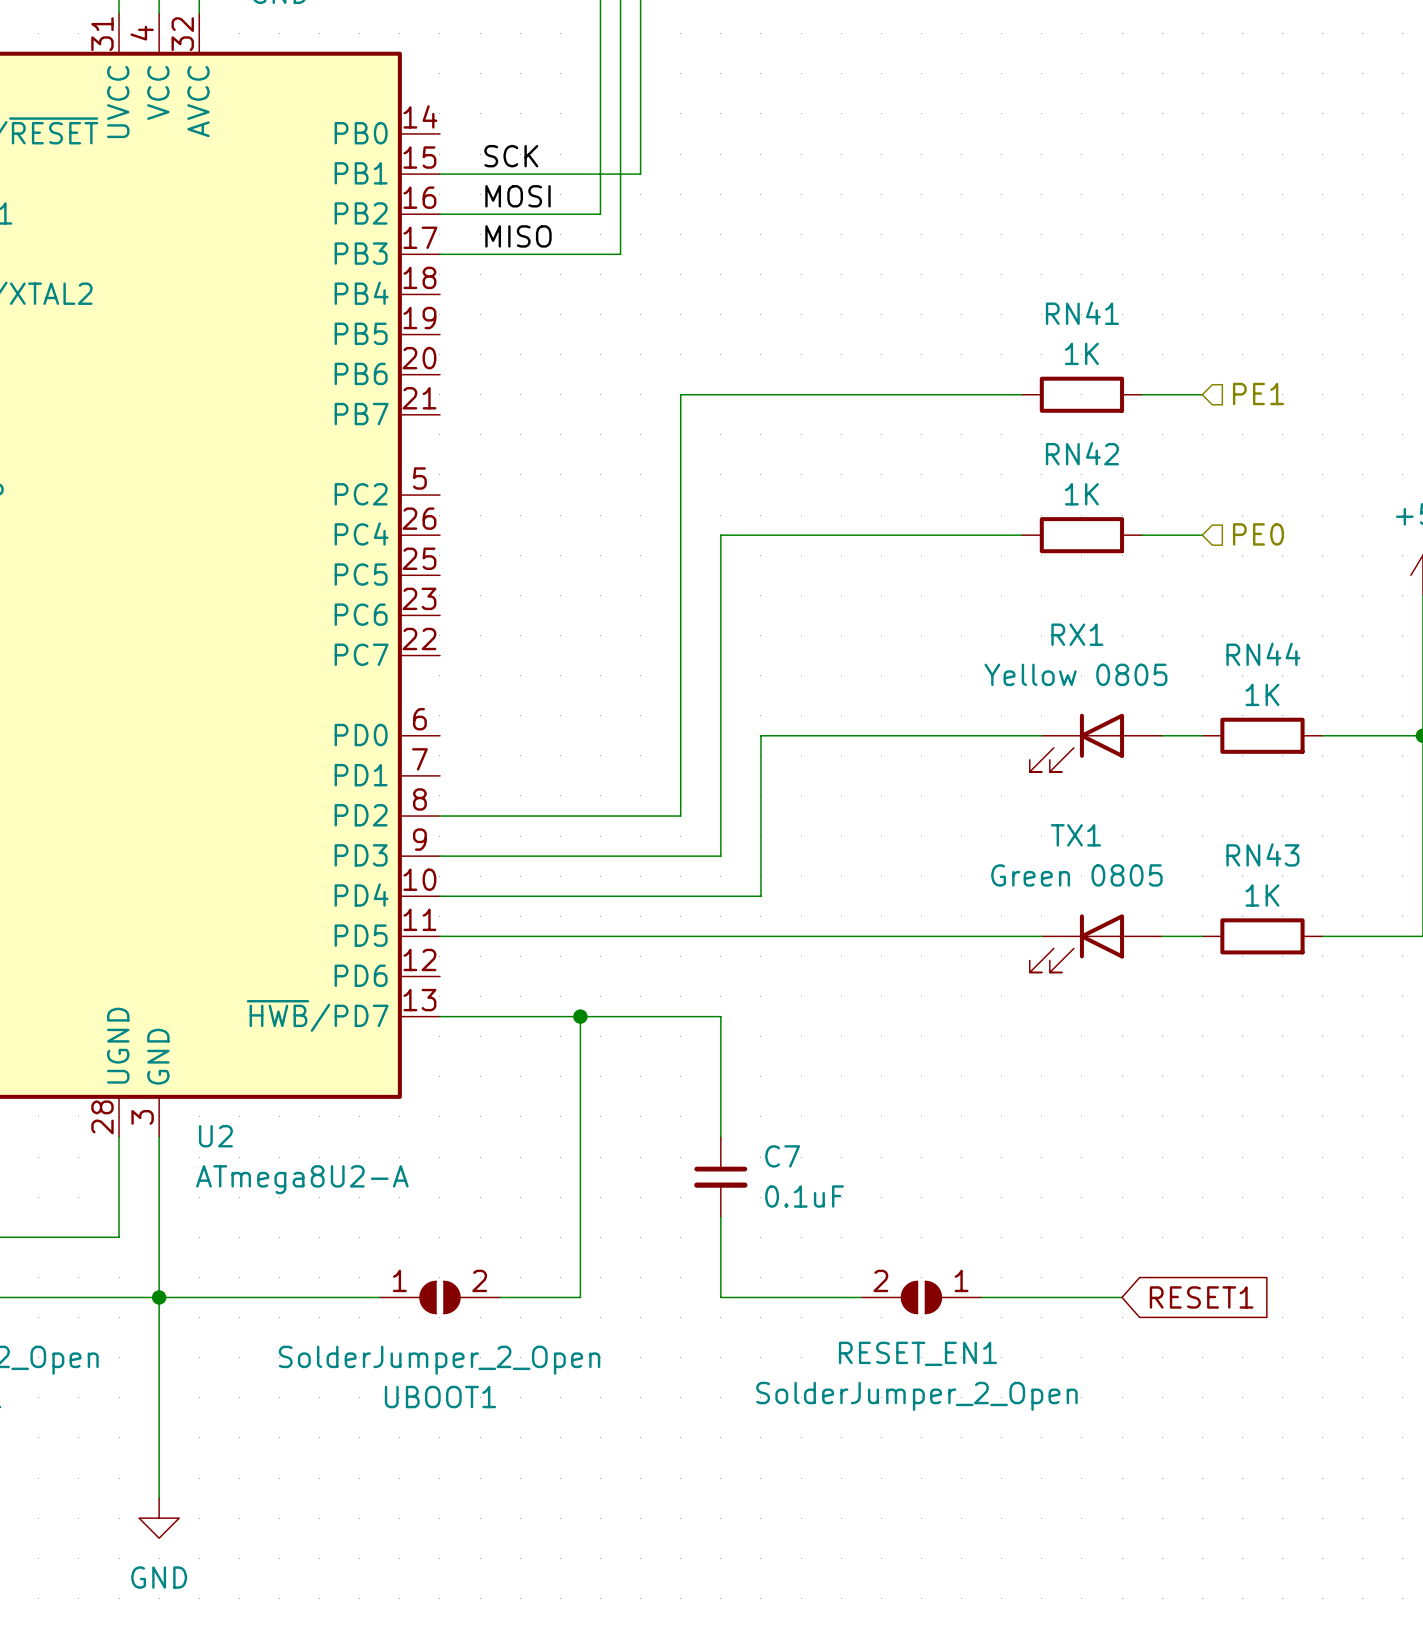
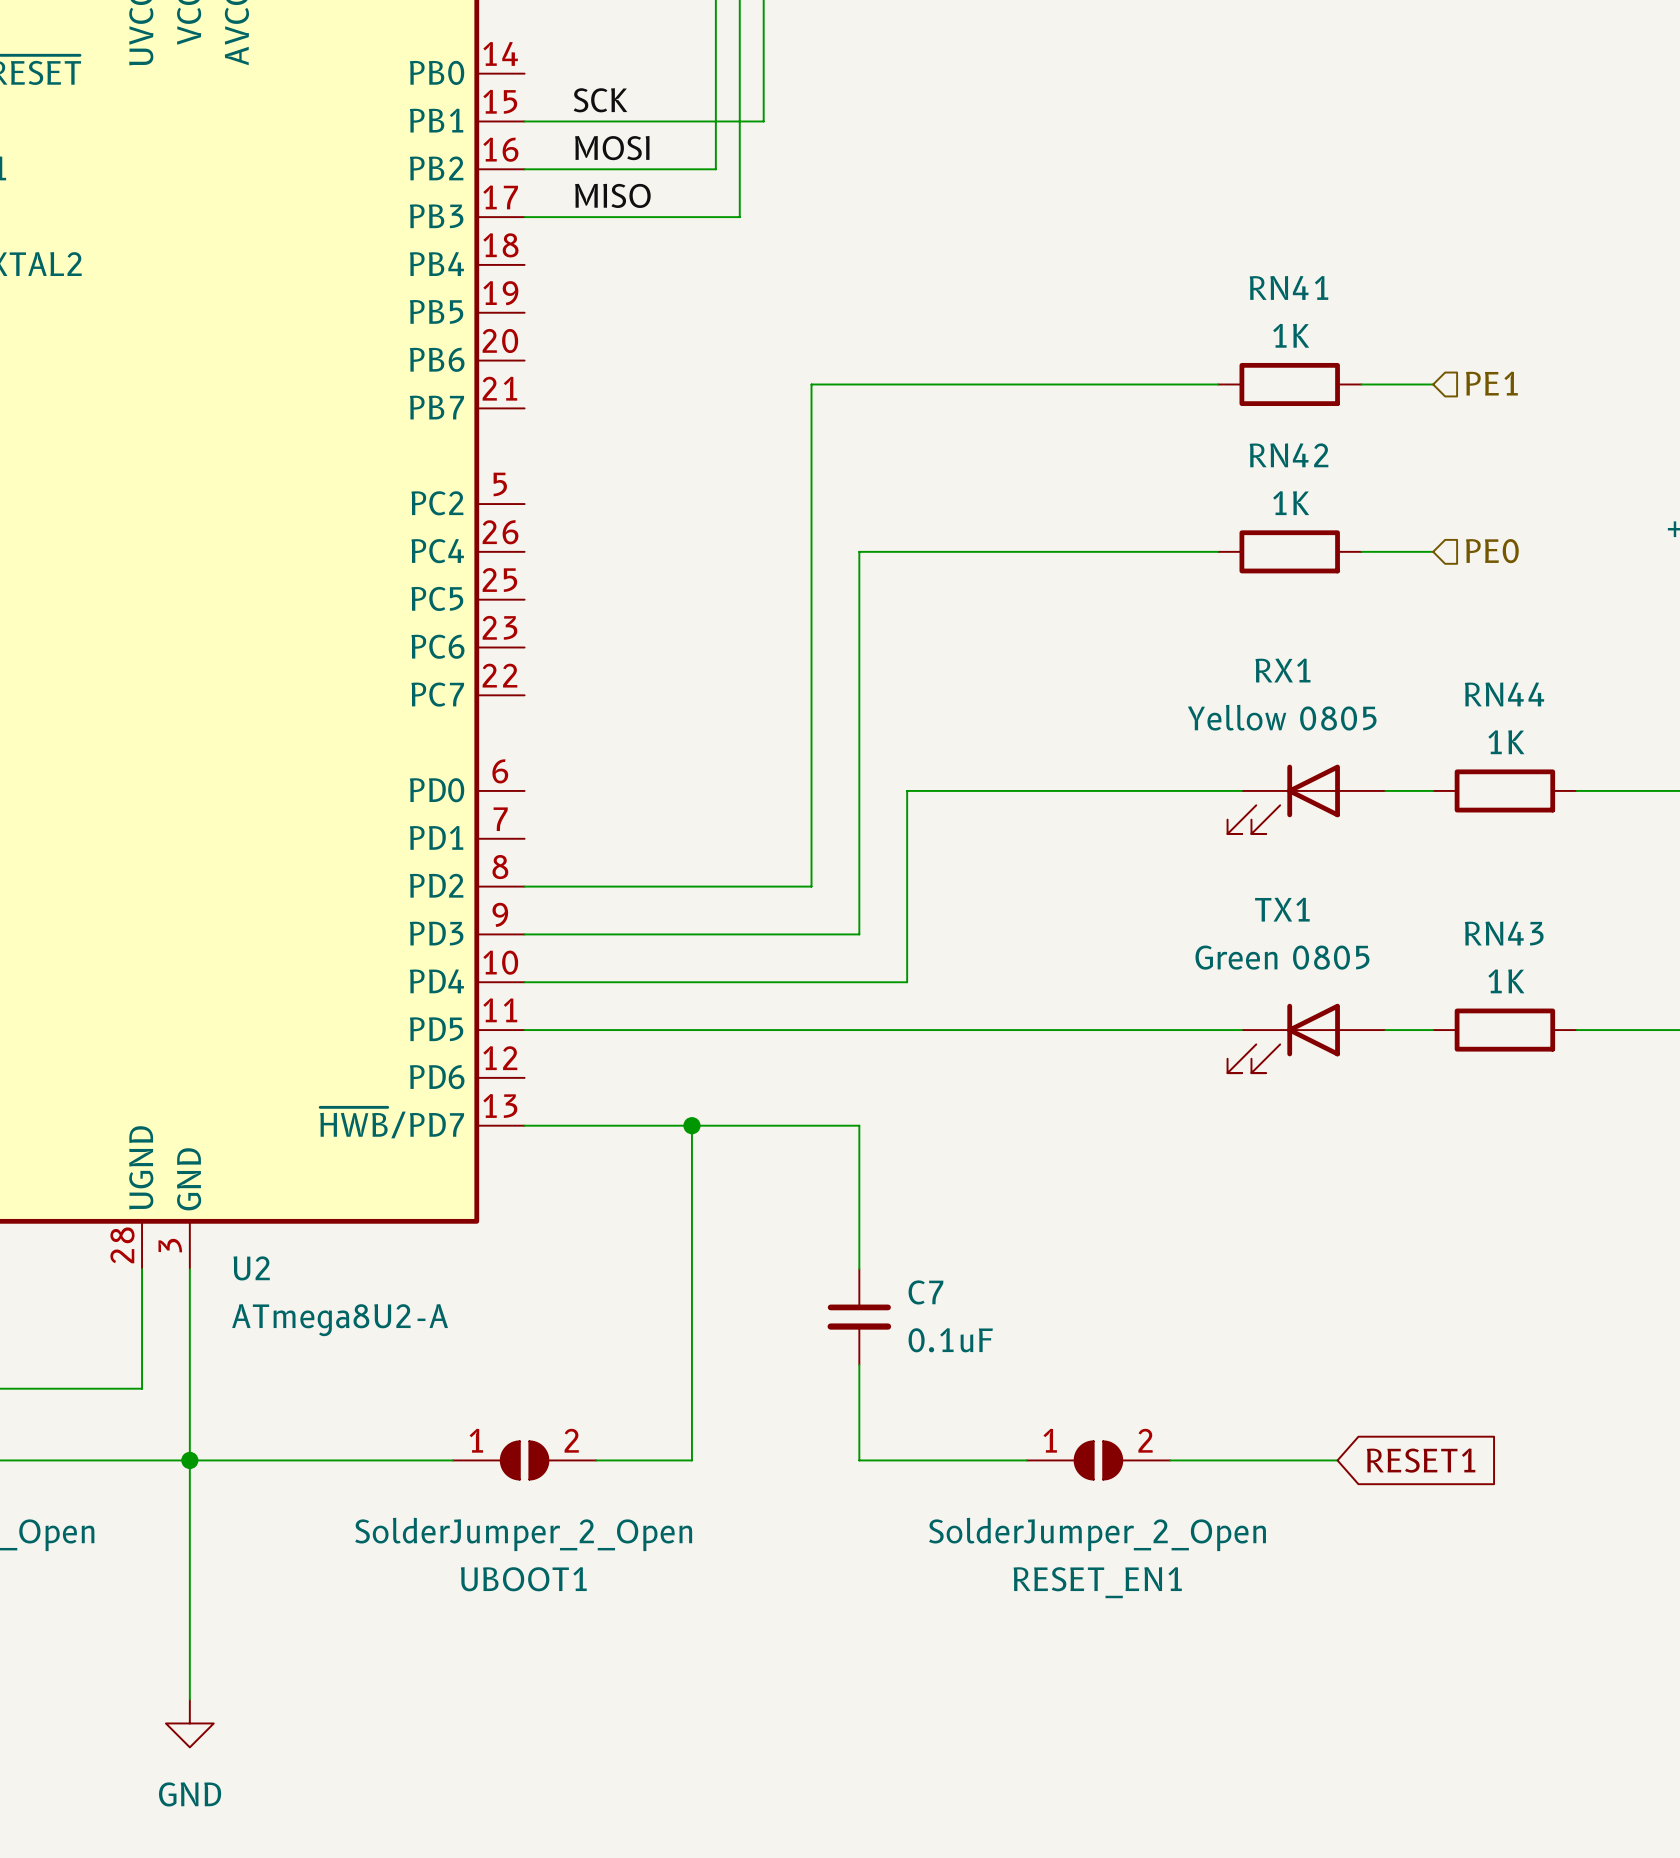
RESET_EN1 rotation: 0° (921, 1297) -> 180° (1098, 1460)
RESET_EN1 name position: RESET_EN1 (917, 1353) -> RESET_EN1 (1097, 1582)
RESET_EN1 value position: SolderJumper_2_Open (916, 1396) -> SolderJumper_2_Open (1097, 1534)

